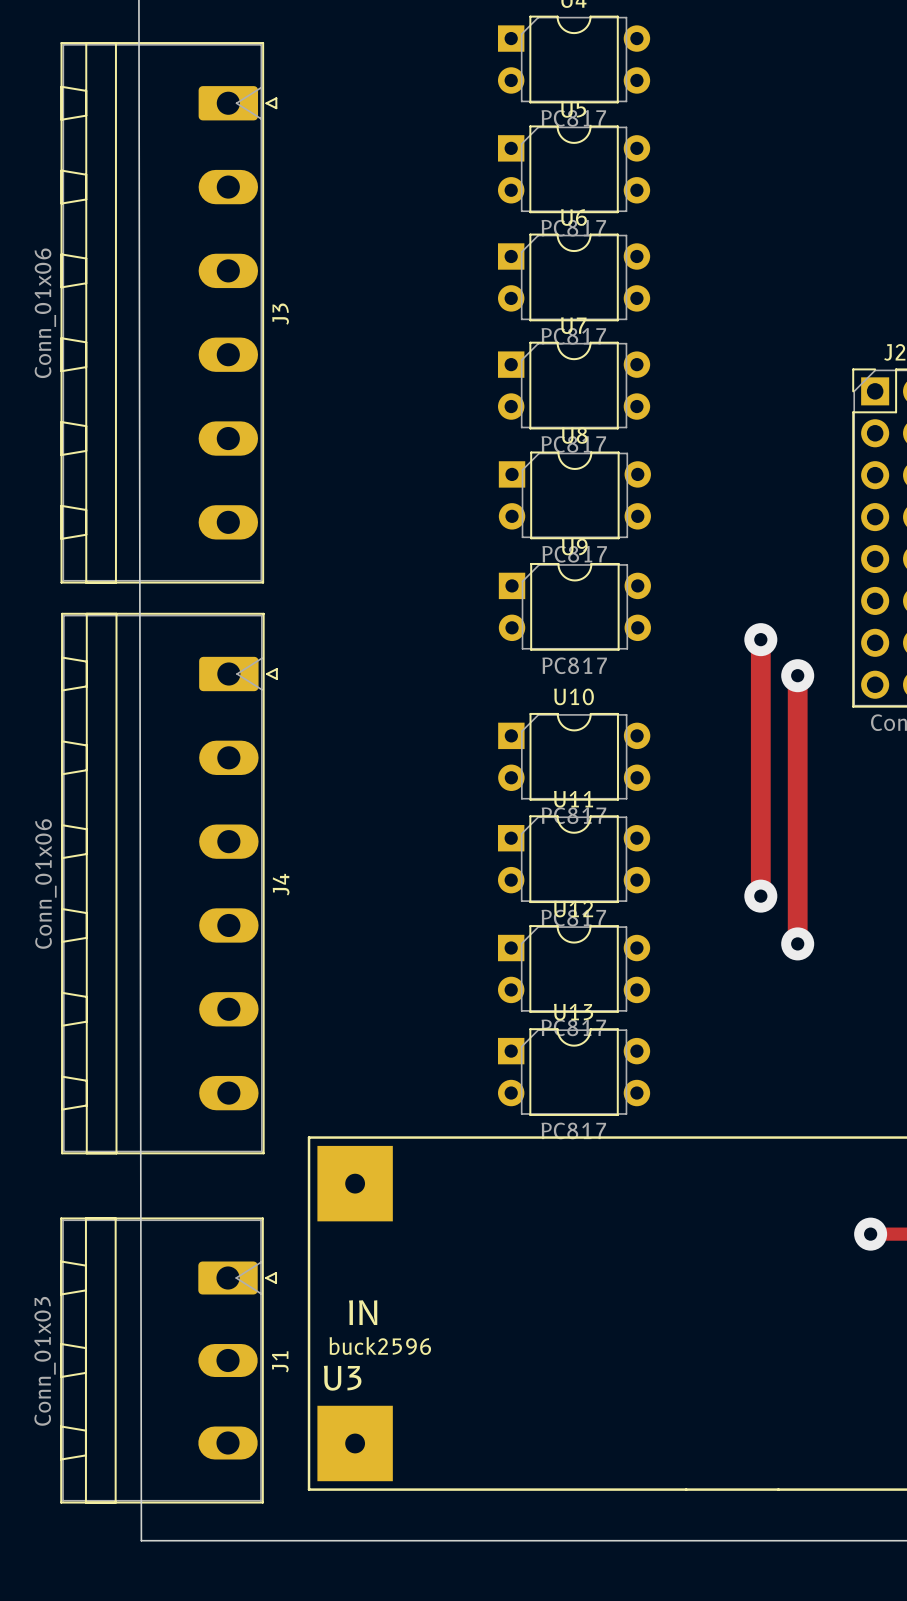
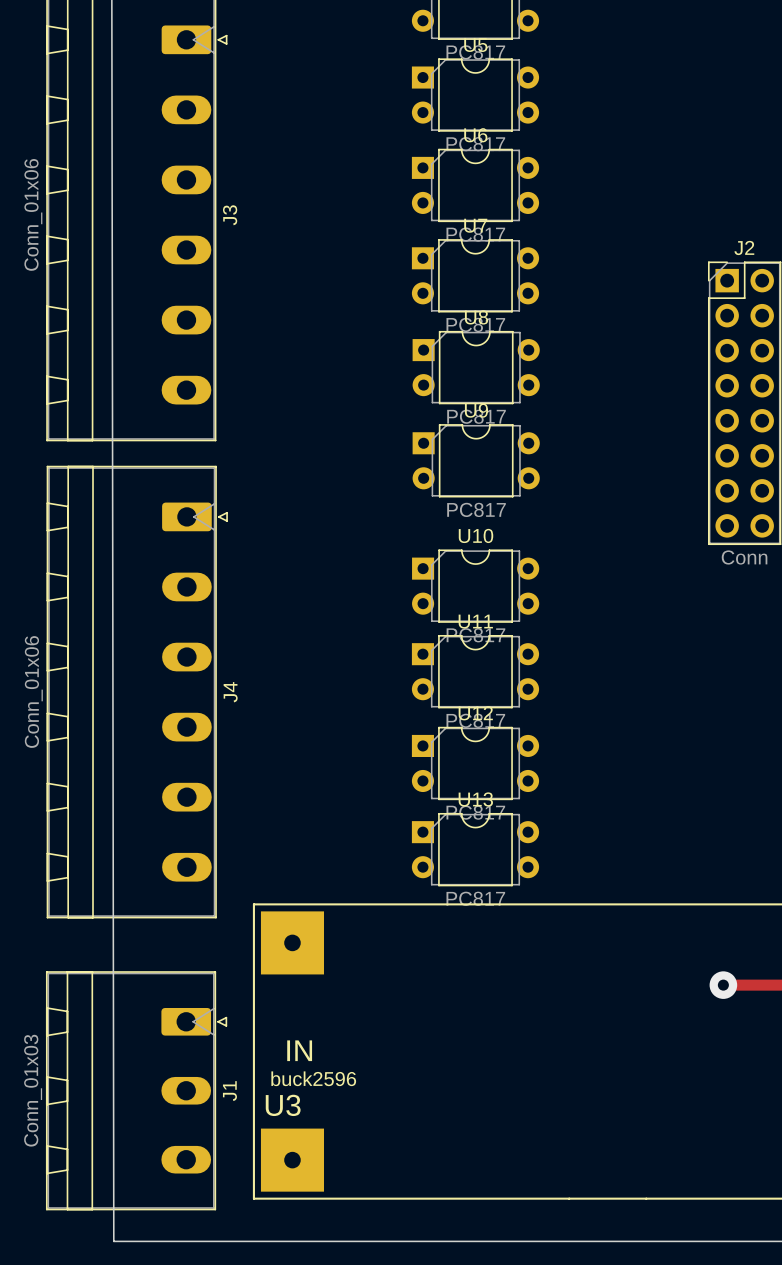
track: (760, 639) (760, 896) -> none
via: (760, 639) -> none
track: (797, 675) (797, 943) -> none
via: (797, 675) -> none
via: (760, 896) -> none
via: (797, 943) -> none

